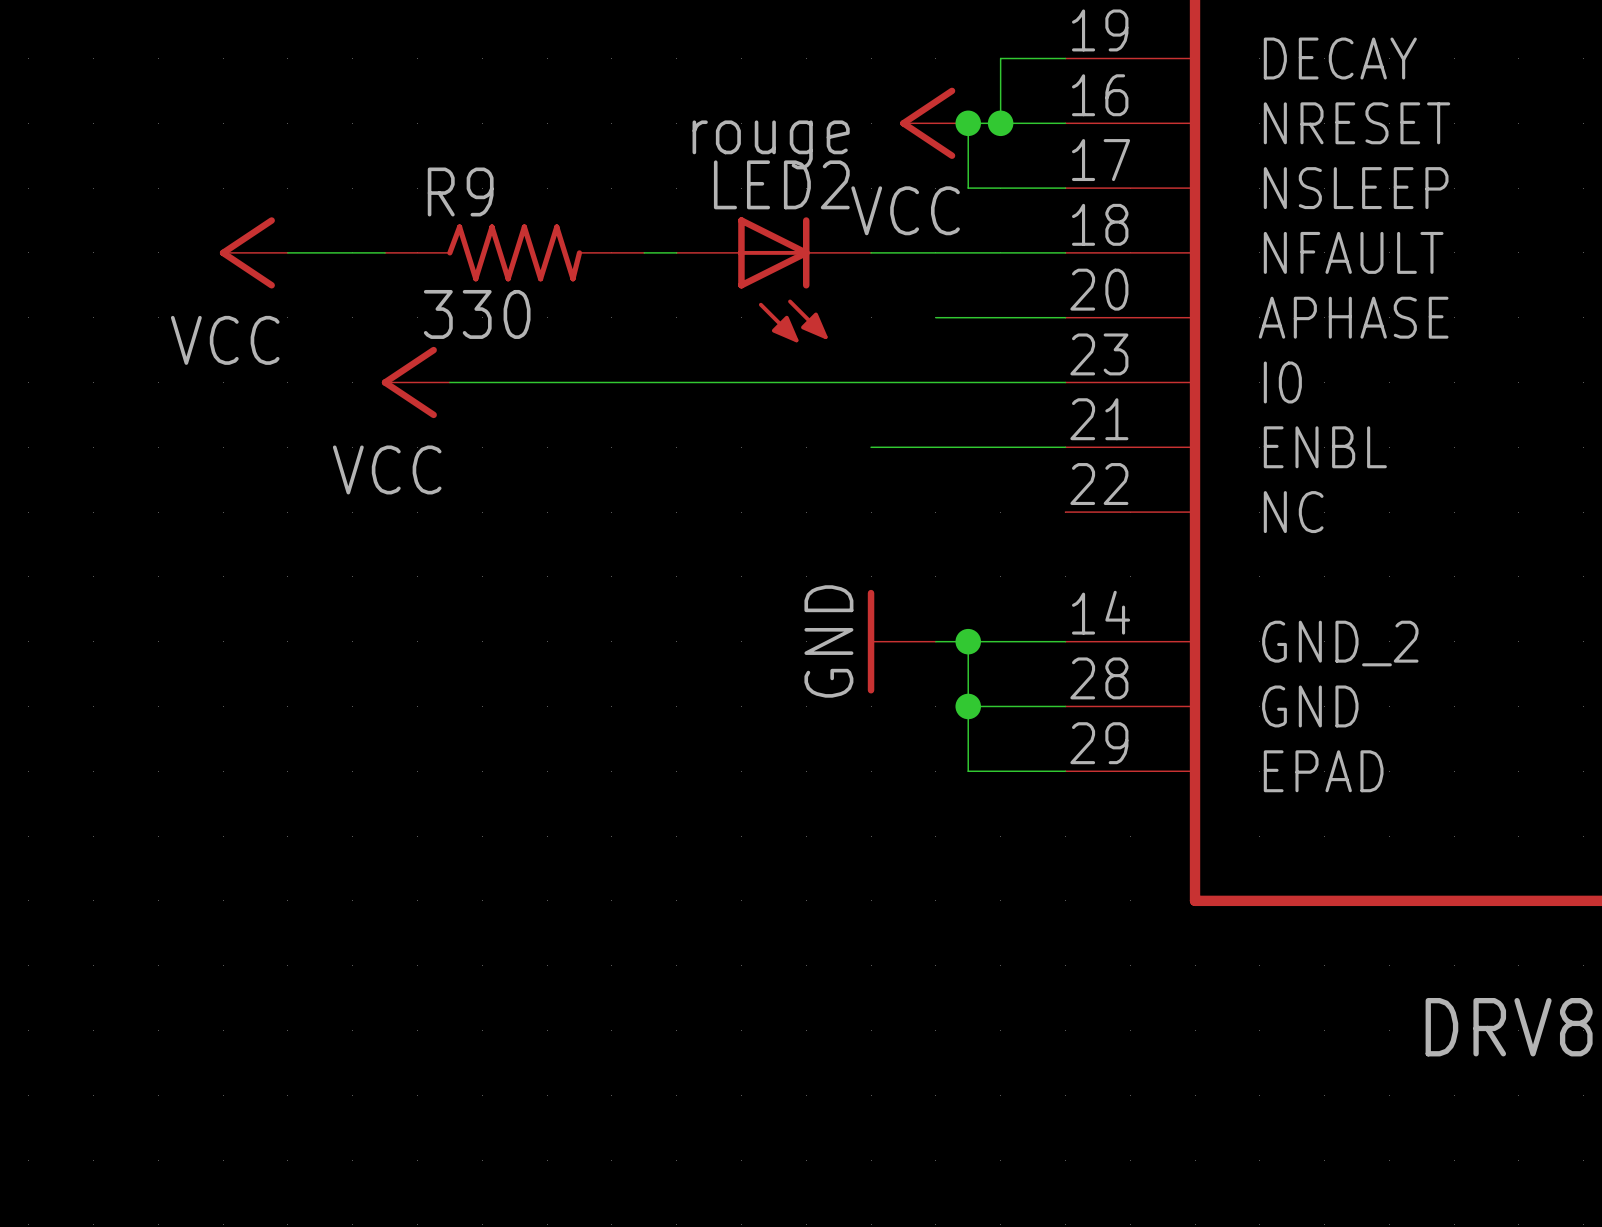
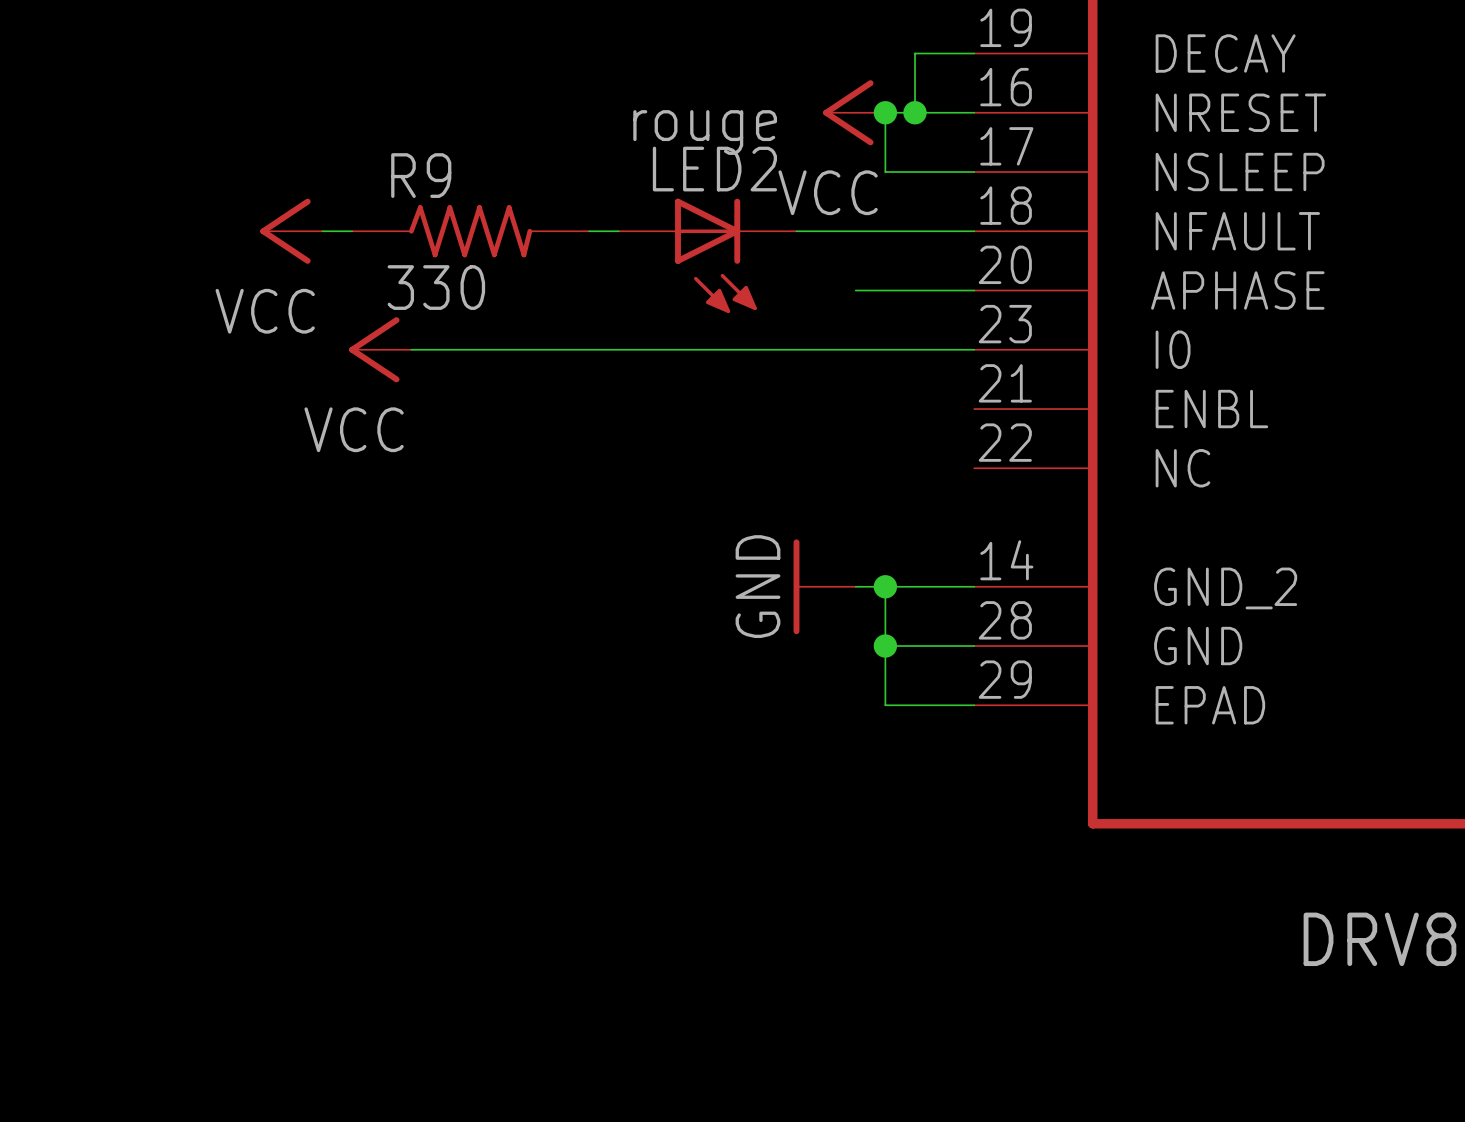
power symbol position: VCC (253, 252) -> VCC (291, 231)
wire: (871, 447) (1065, 447) -> none

